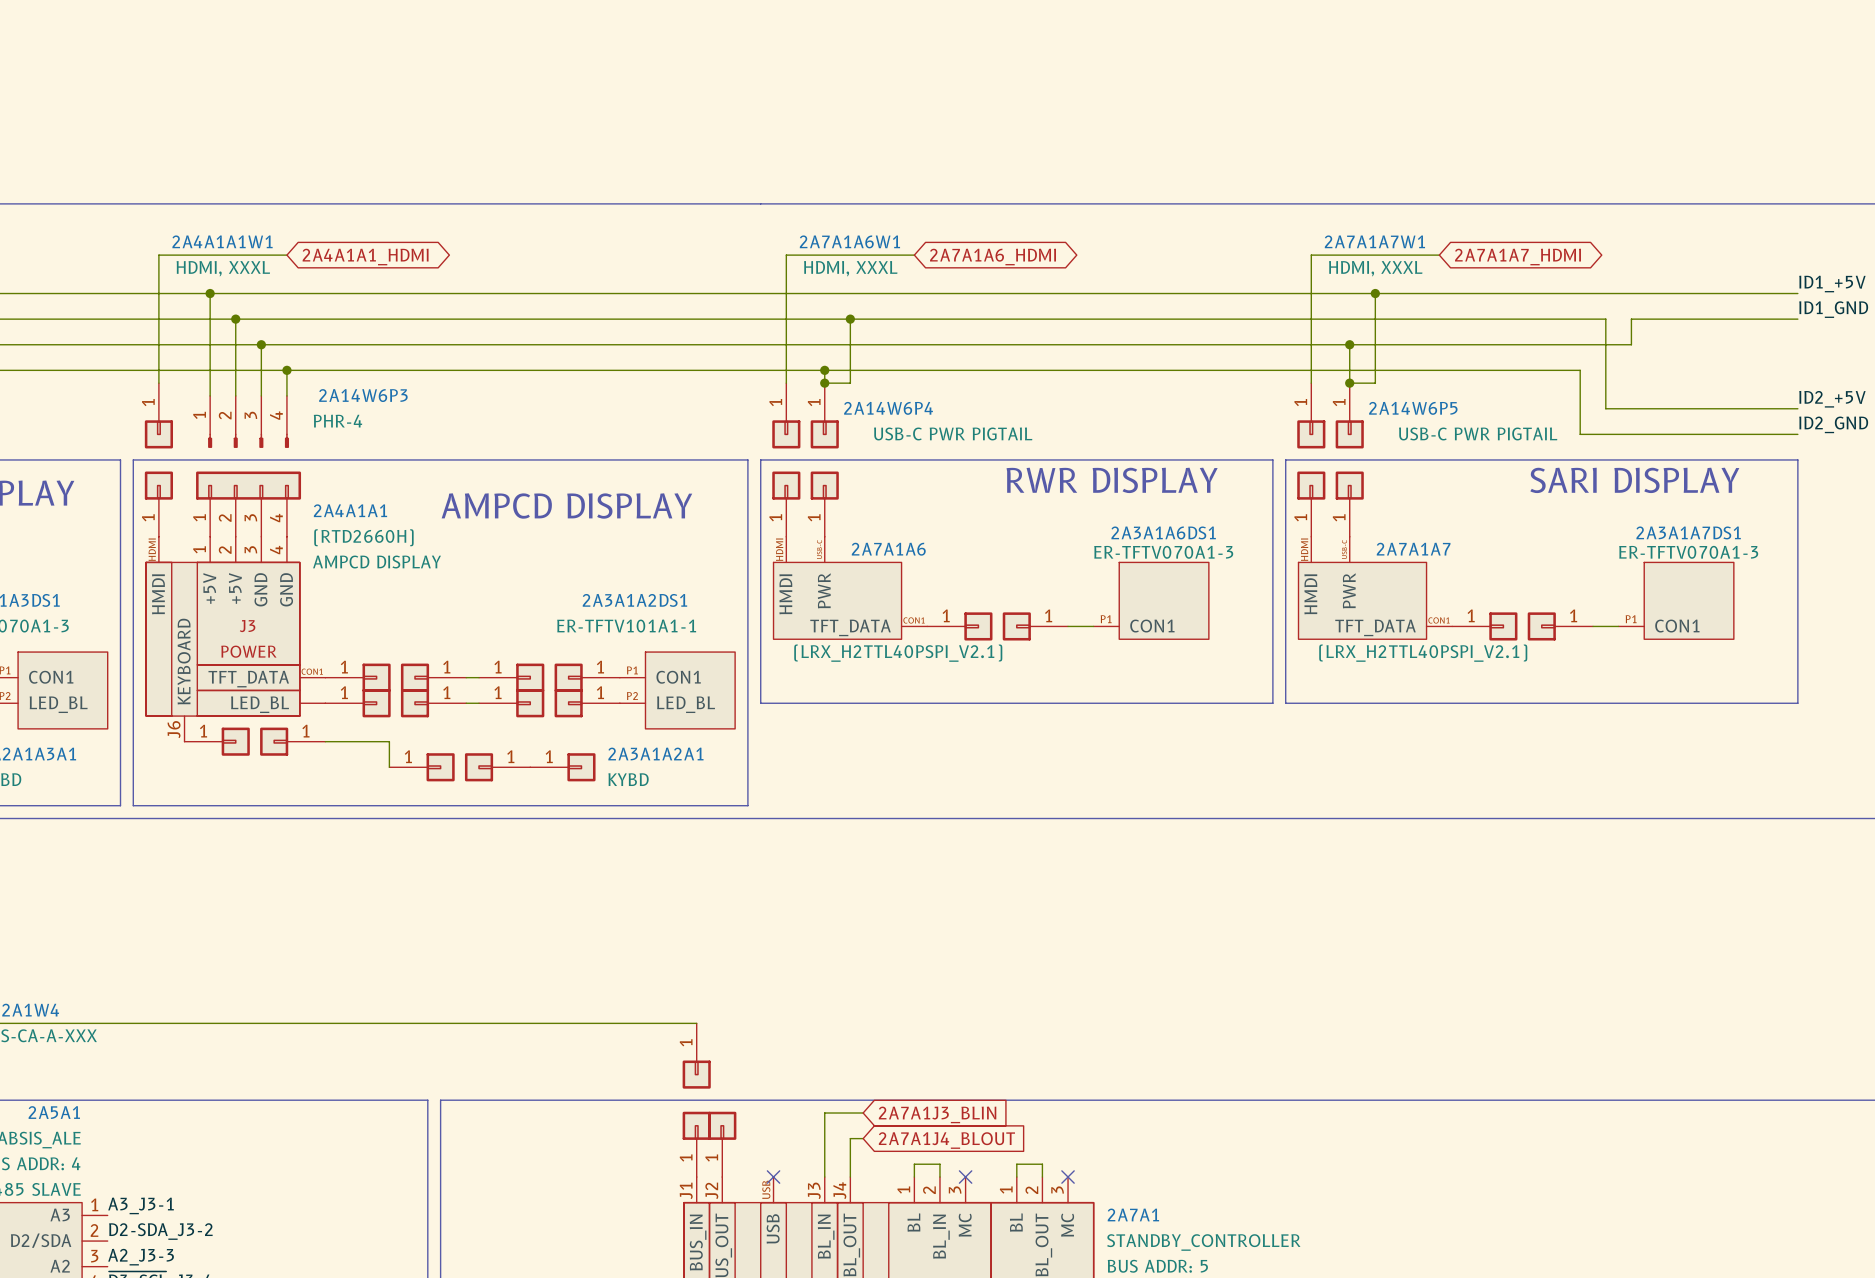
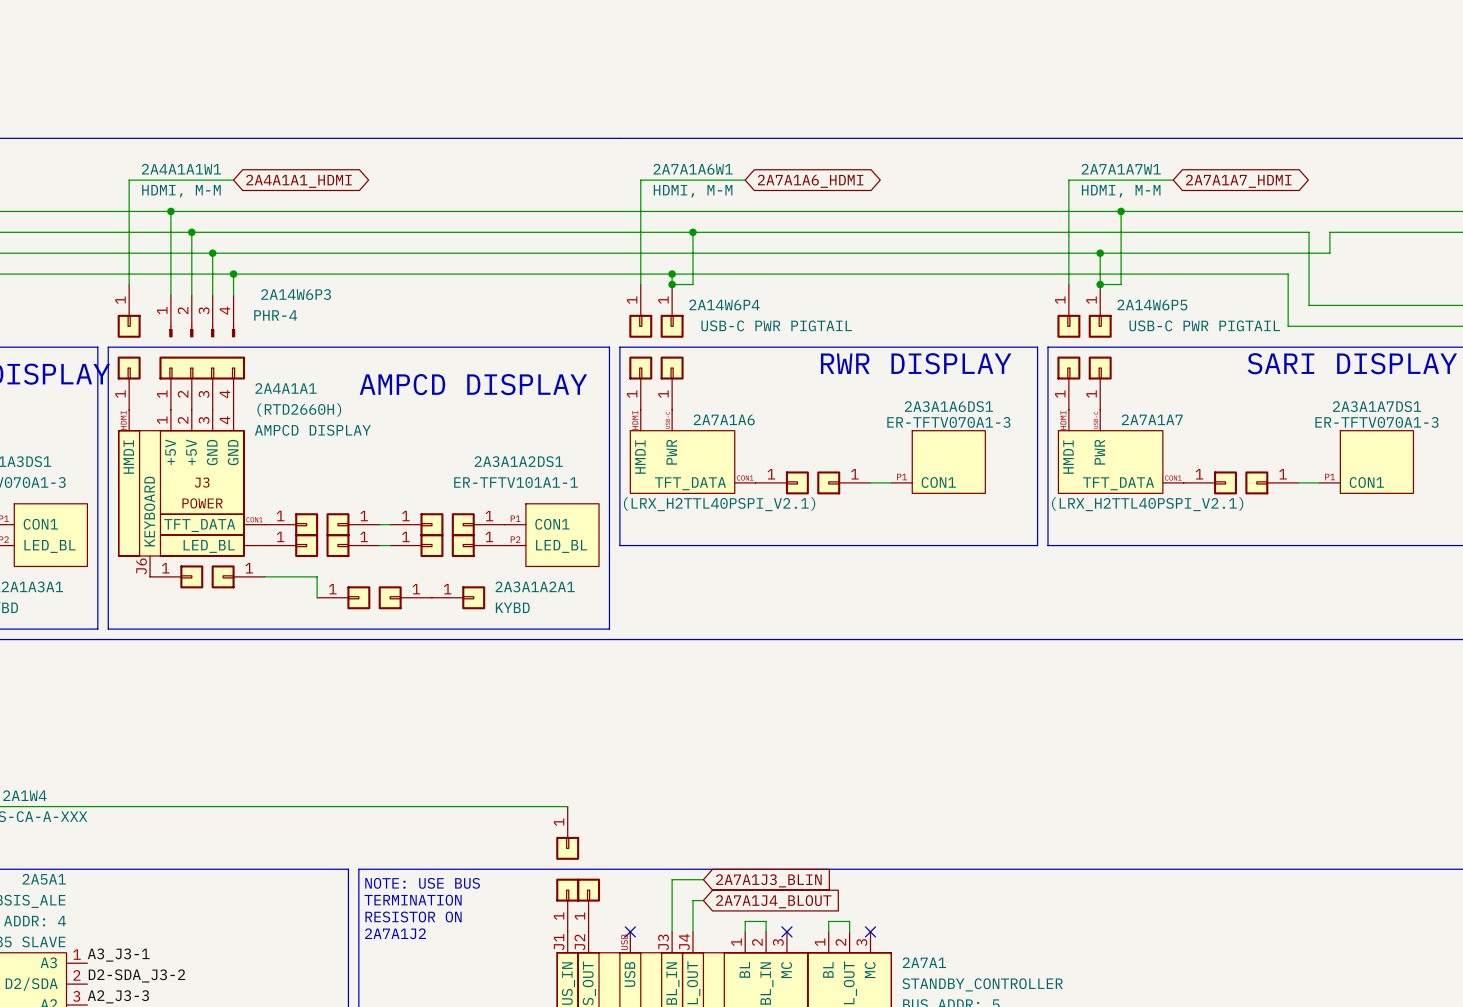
2A4A1A1W1 value: HDMI, XXXL (223, 268) -> HDMI, M-M (181, 191)
2A7A1A6W1 value: HDMI, XXXL (850, 268) -> HDMI, M-M (693, 191)
2A7A1A7W1 value: HDMI, XXXL (1375, 268) -> HDMI, M-M (1121, 191)
text: none -> NOTE: USE BUS (422, 883)
text: none -> TERMINATION (413, 900)
text: none -> RESISTOR ON (413, 916)
text: none -> 2A7A1J2 (395, 933)

